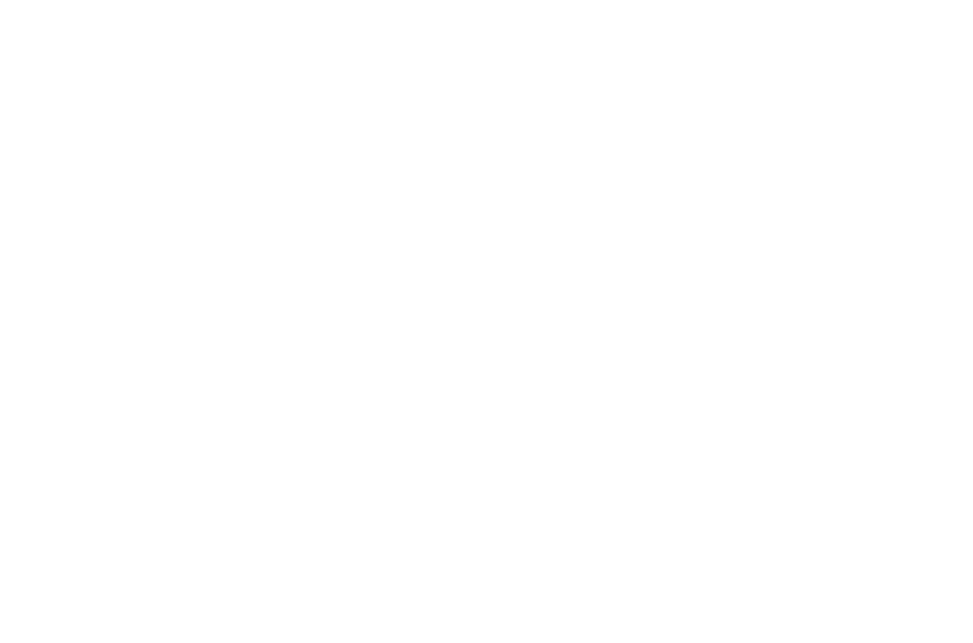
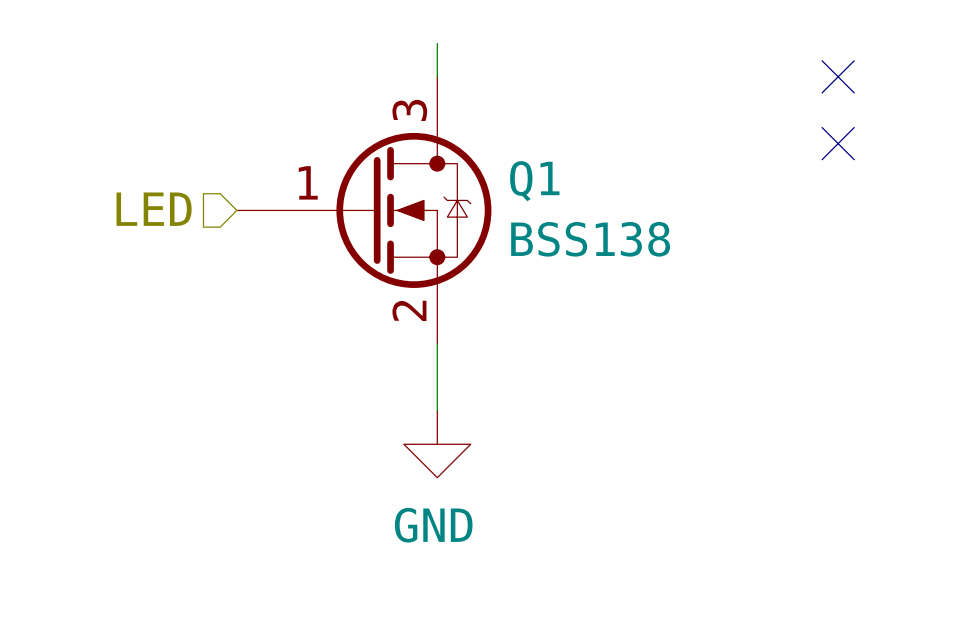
wire: none -> (437, 43) (437, 76)
no-connect mark: none -> (838, 76)
no-connect mark: none -> (838, 143)
hierarchical label: none -> LED (154, 209)
Q1: none -> BSS138 (364, 210)
wire: none -> (437, 344) (437, 410)
power symbol: none -> GND (437, 444)

